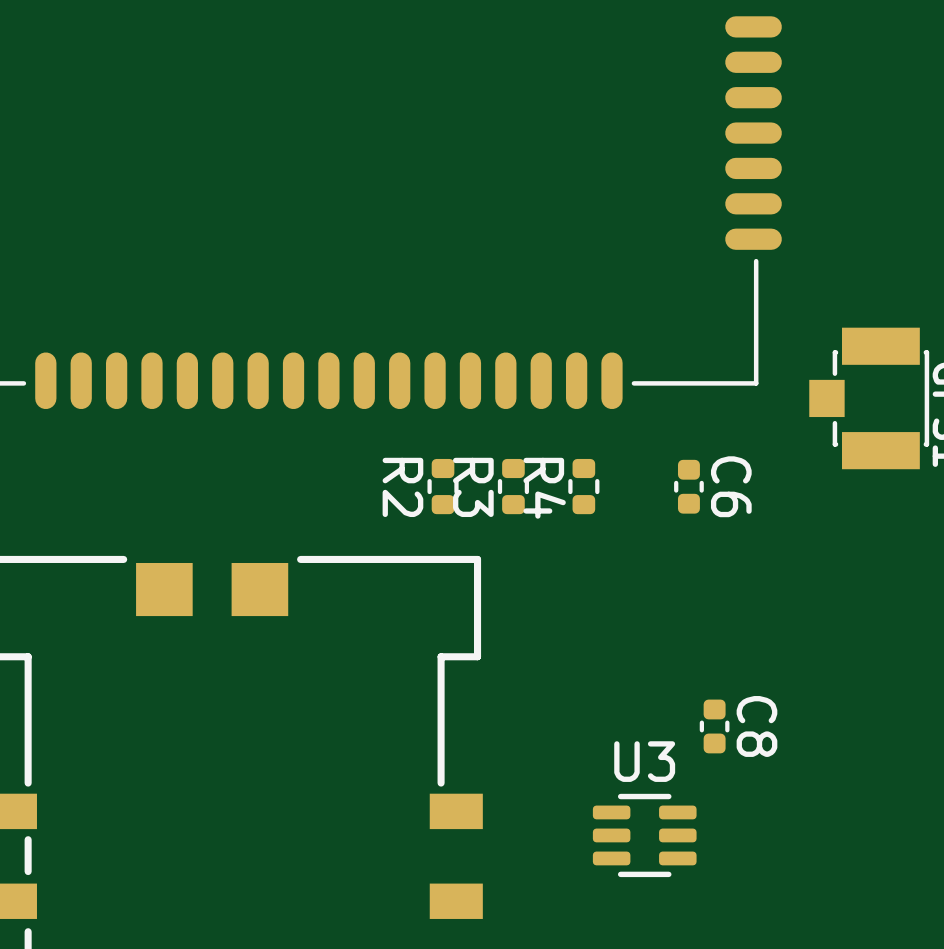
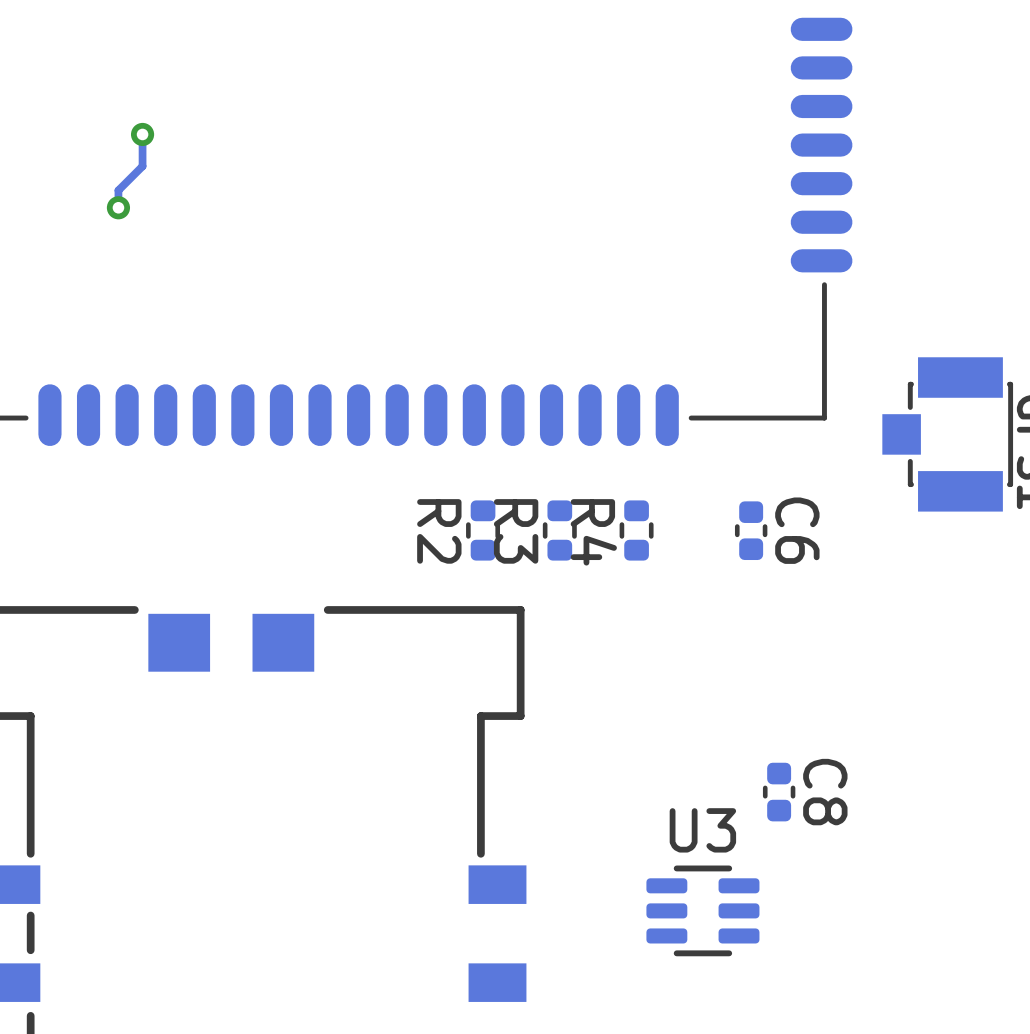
track: none -> (142, 134) (142, 166) (118, 190) (118, 207)
via: none -> (142, 134)
via: none -> (118, 207)

